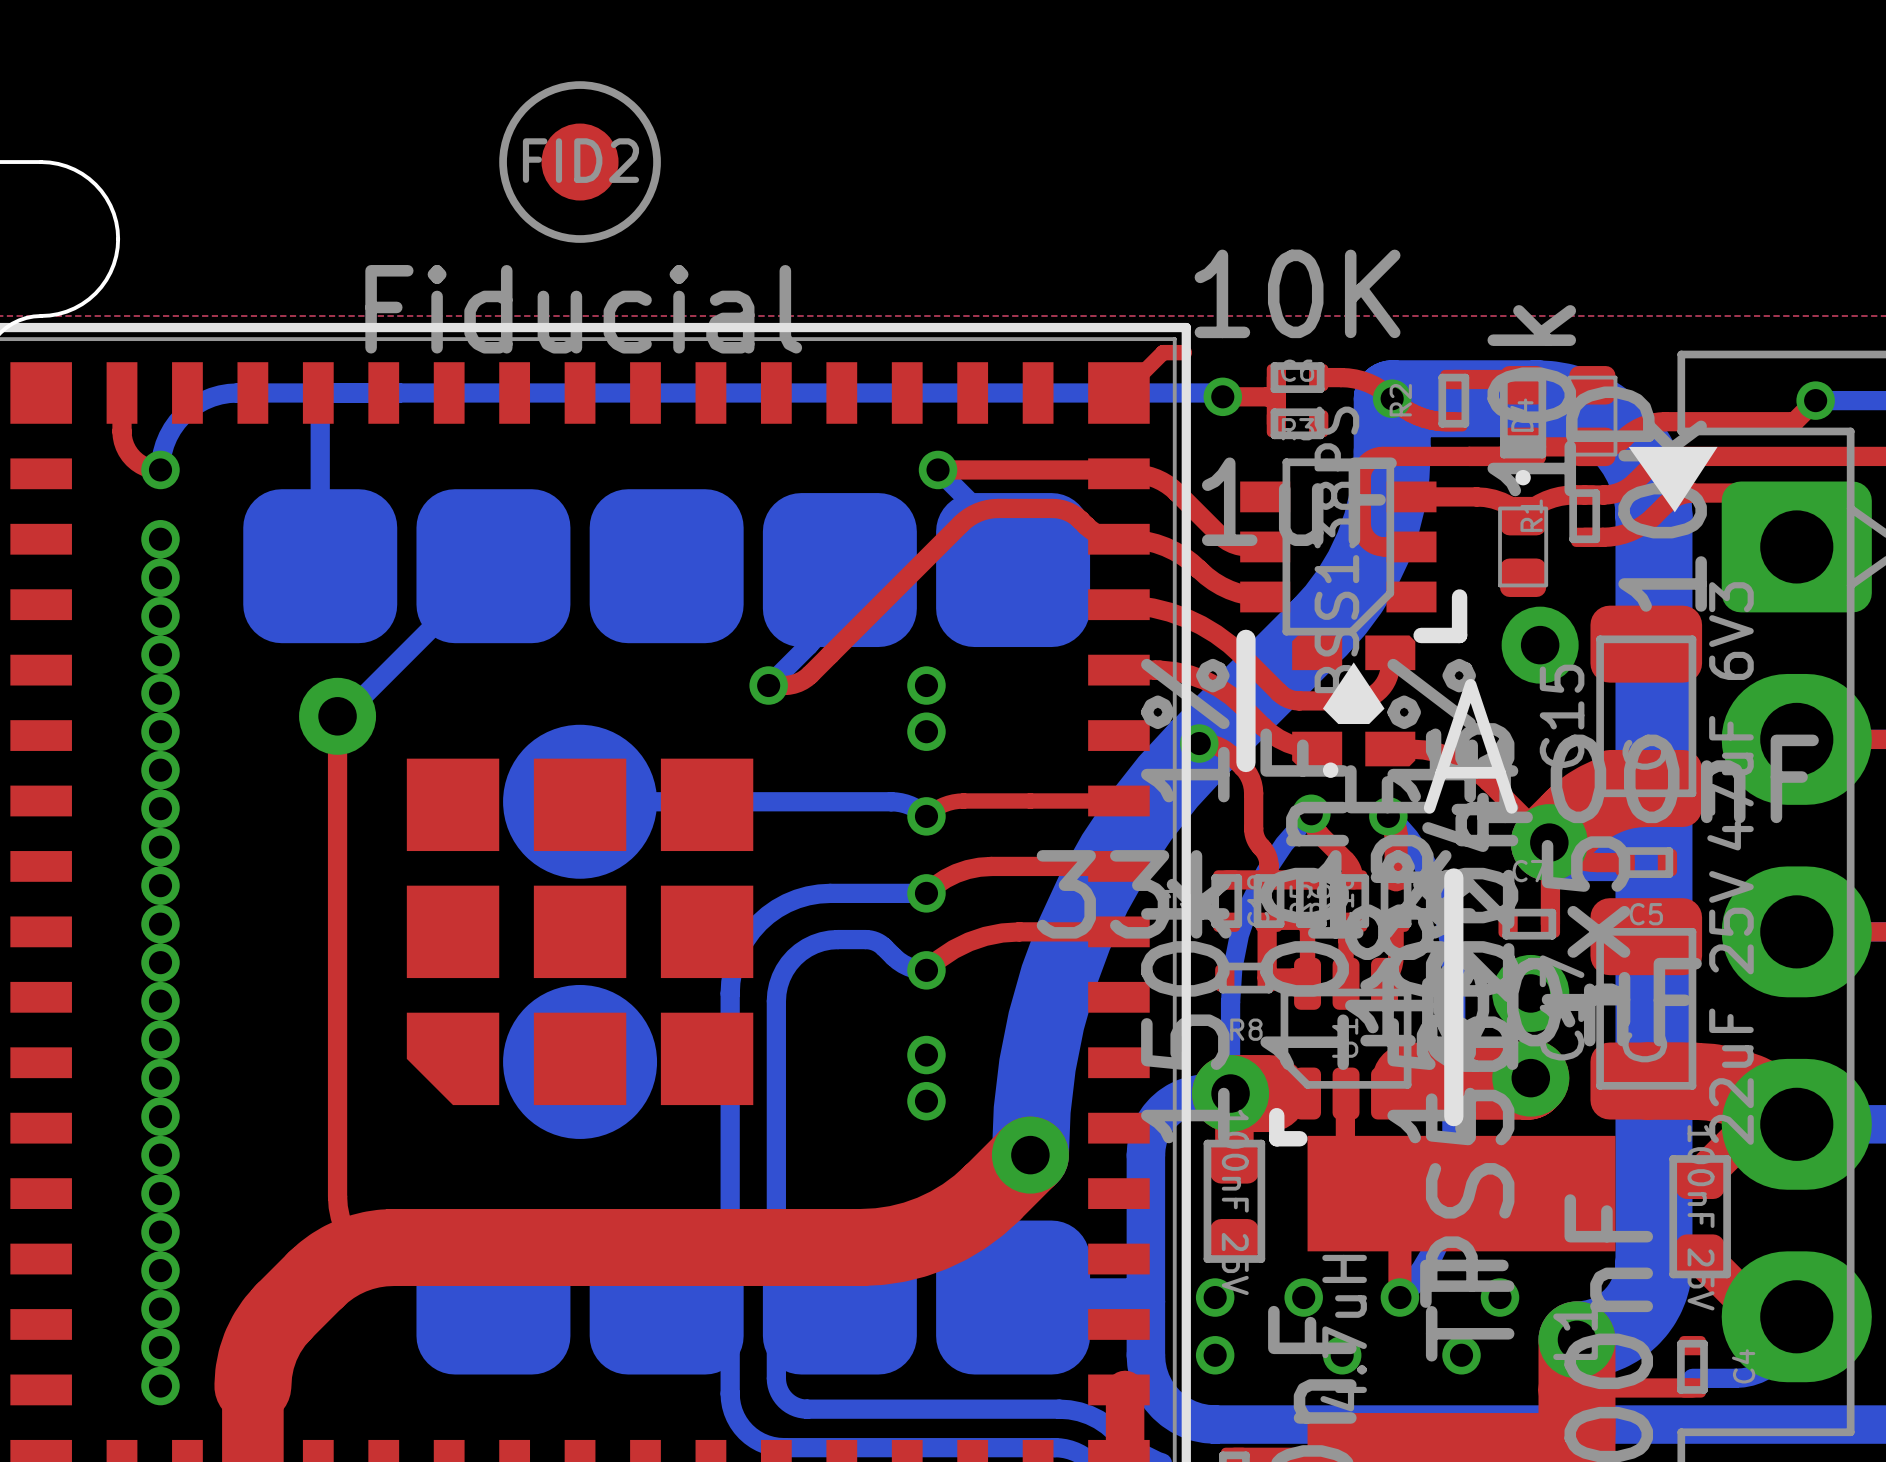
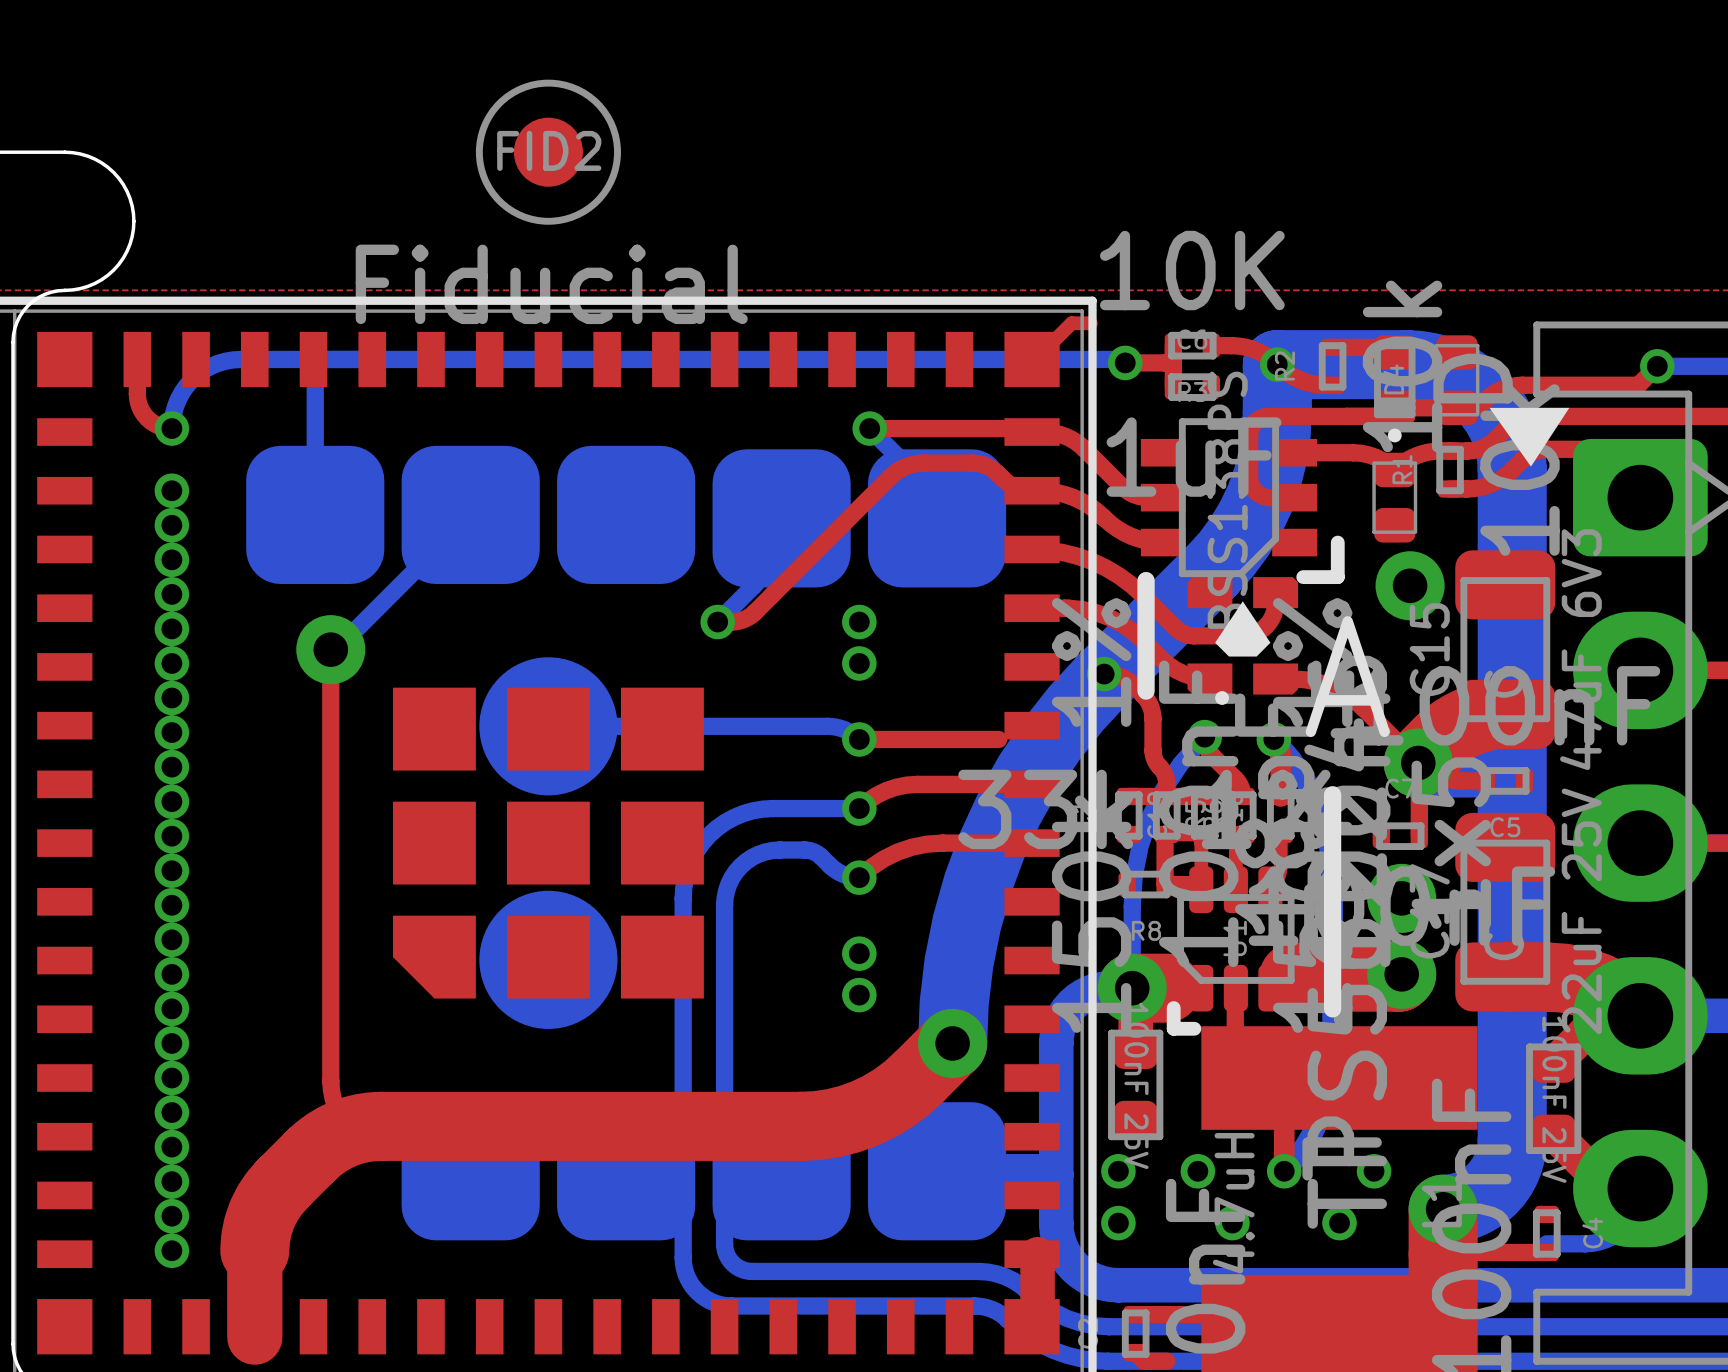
top track: (1118, 800) (958, 801) (943, 804) (926, 816) -> (998, 739) (859, 739)

